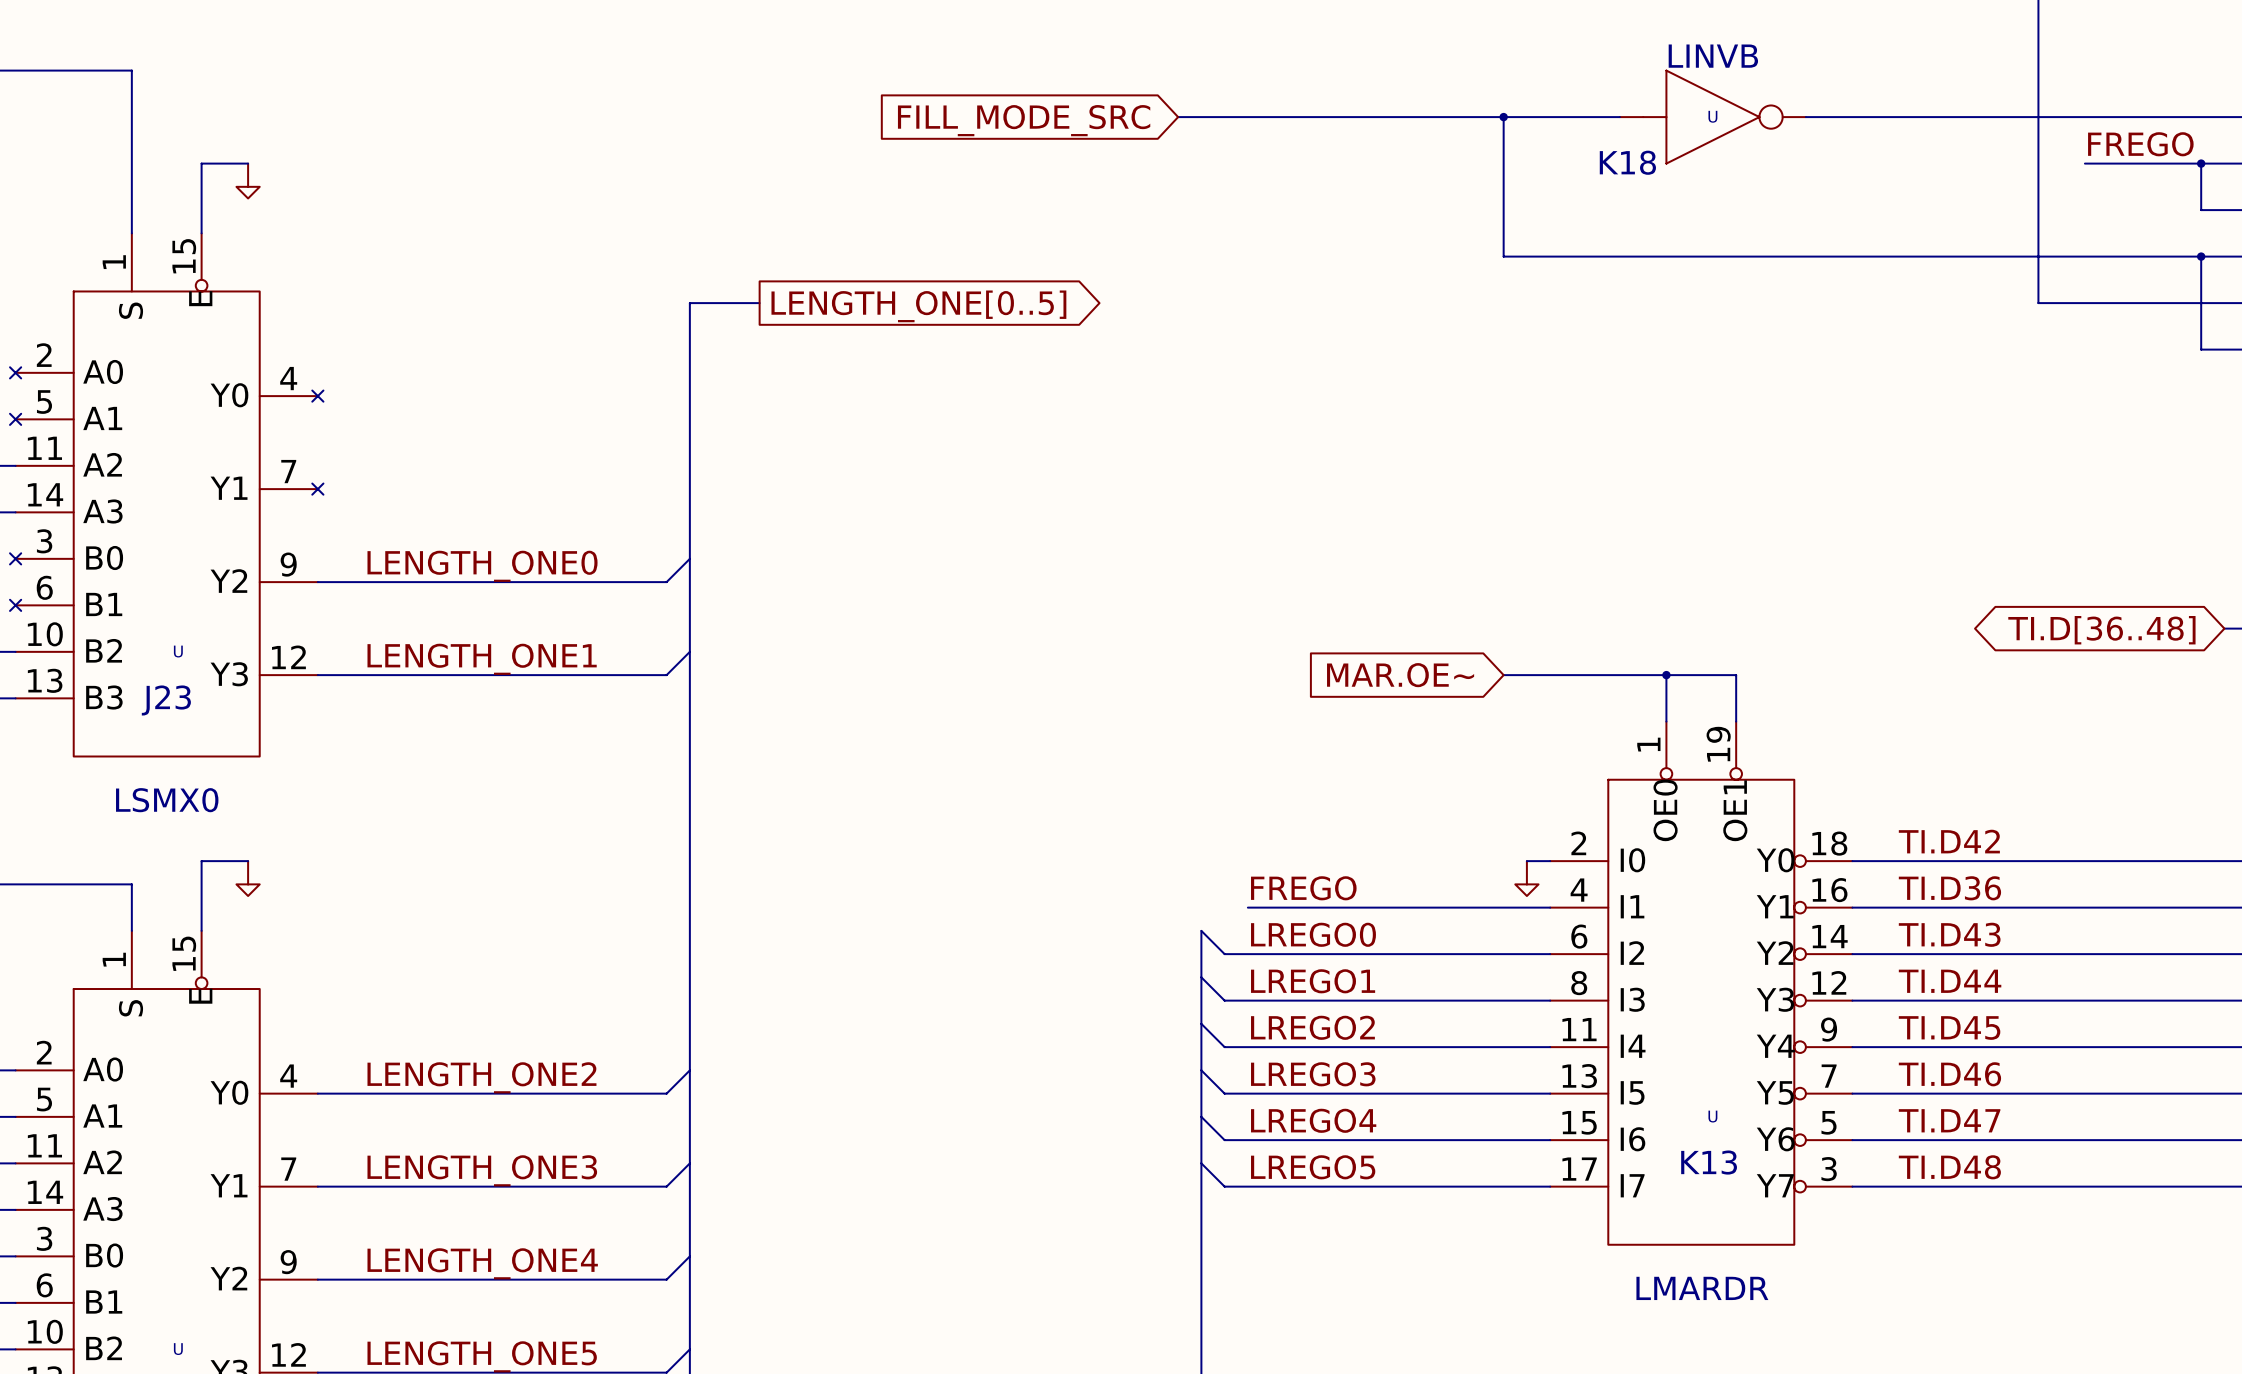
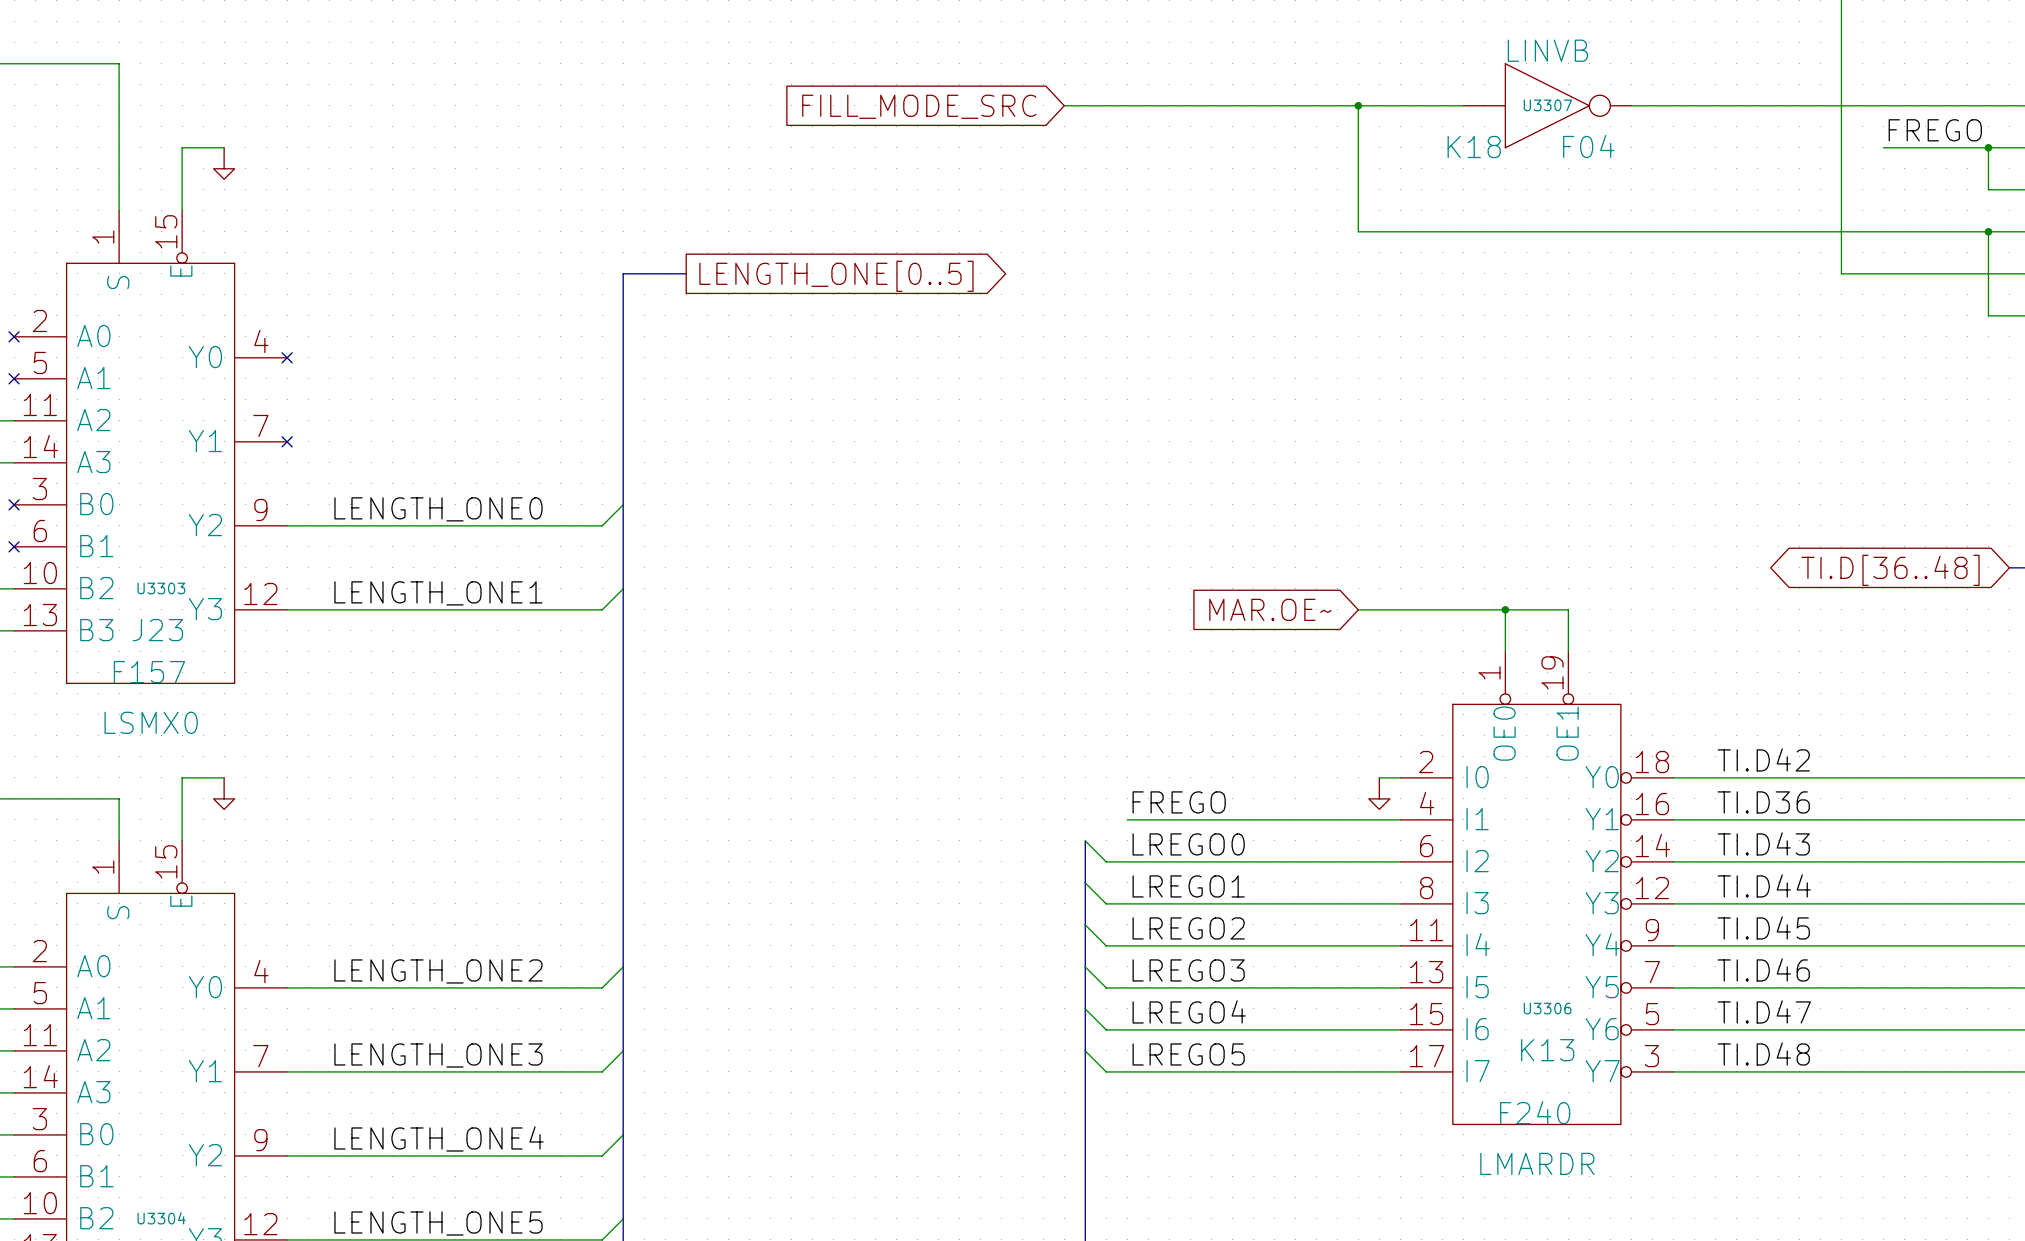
U name: U (1712, 116) -> U3307 (1547, 105)
U value: none -> F04 (1588, 146)
U name: U (178, 651) -> U3303 (161, 588)
U value: none -> F157 (149, 672)
U name: U (1712, 1116) -> U3306 (1547, 1008)
U value: none -> F240 (1535, 1112)
U name: U (178, 1349) -> U3304 (161, 1218)

